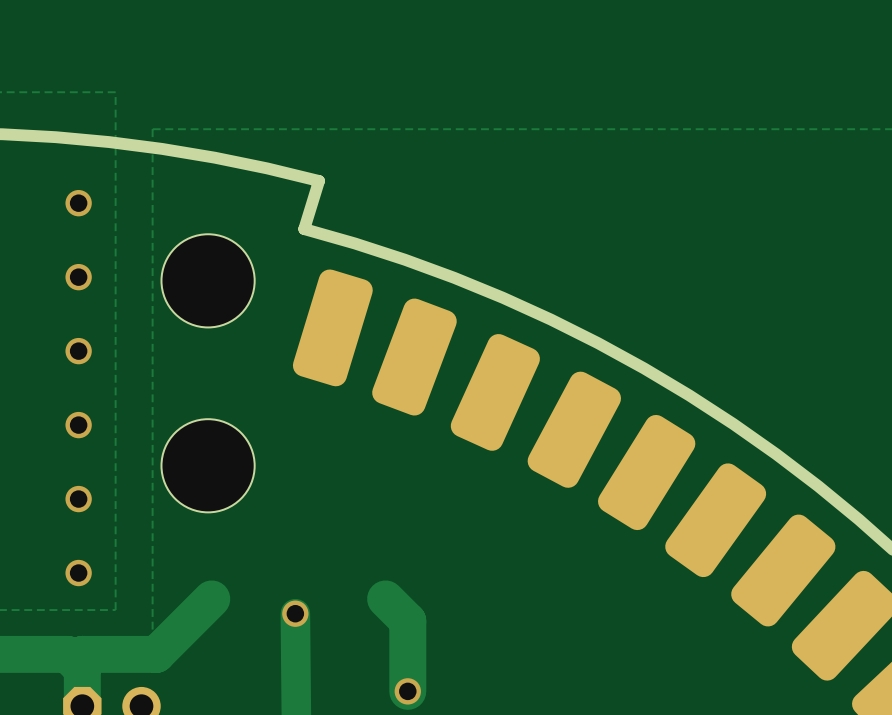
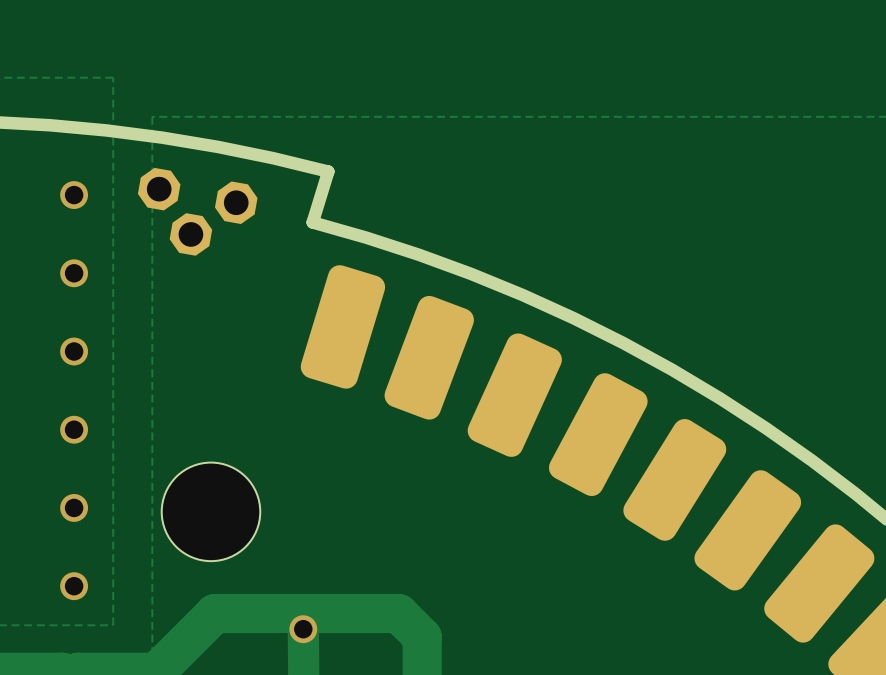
part: none -> (197, 211)
hole: (208, 280) -> none
hole position: (208, 465) -> (210, 511)
track: none -> (398, 613) (214, 613)

